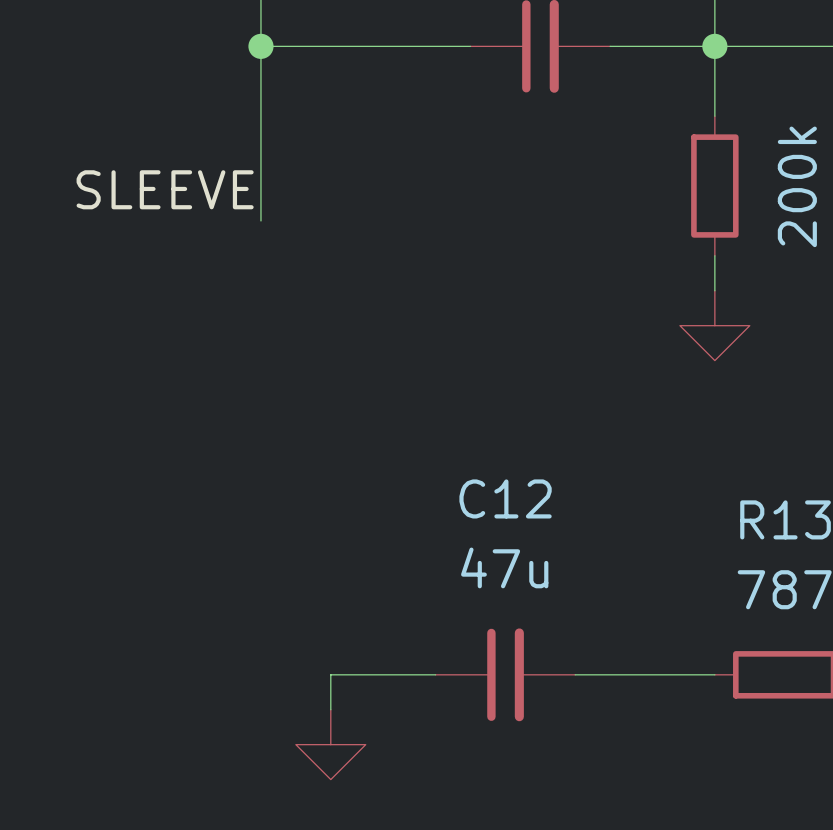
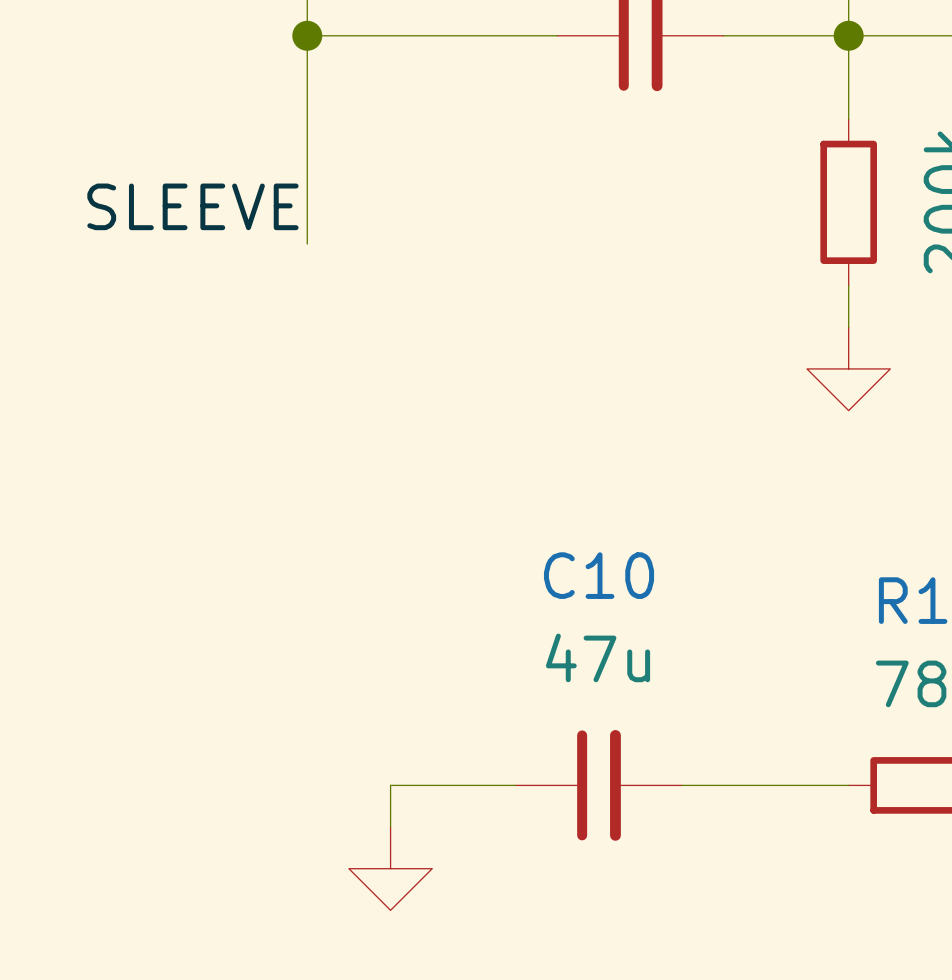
C12 name: C12 (505, 498) -> C10 (599, 575)

